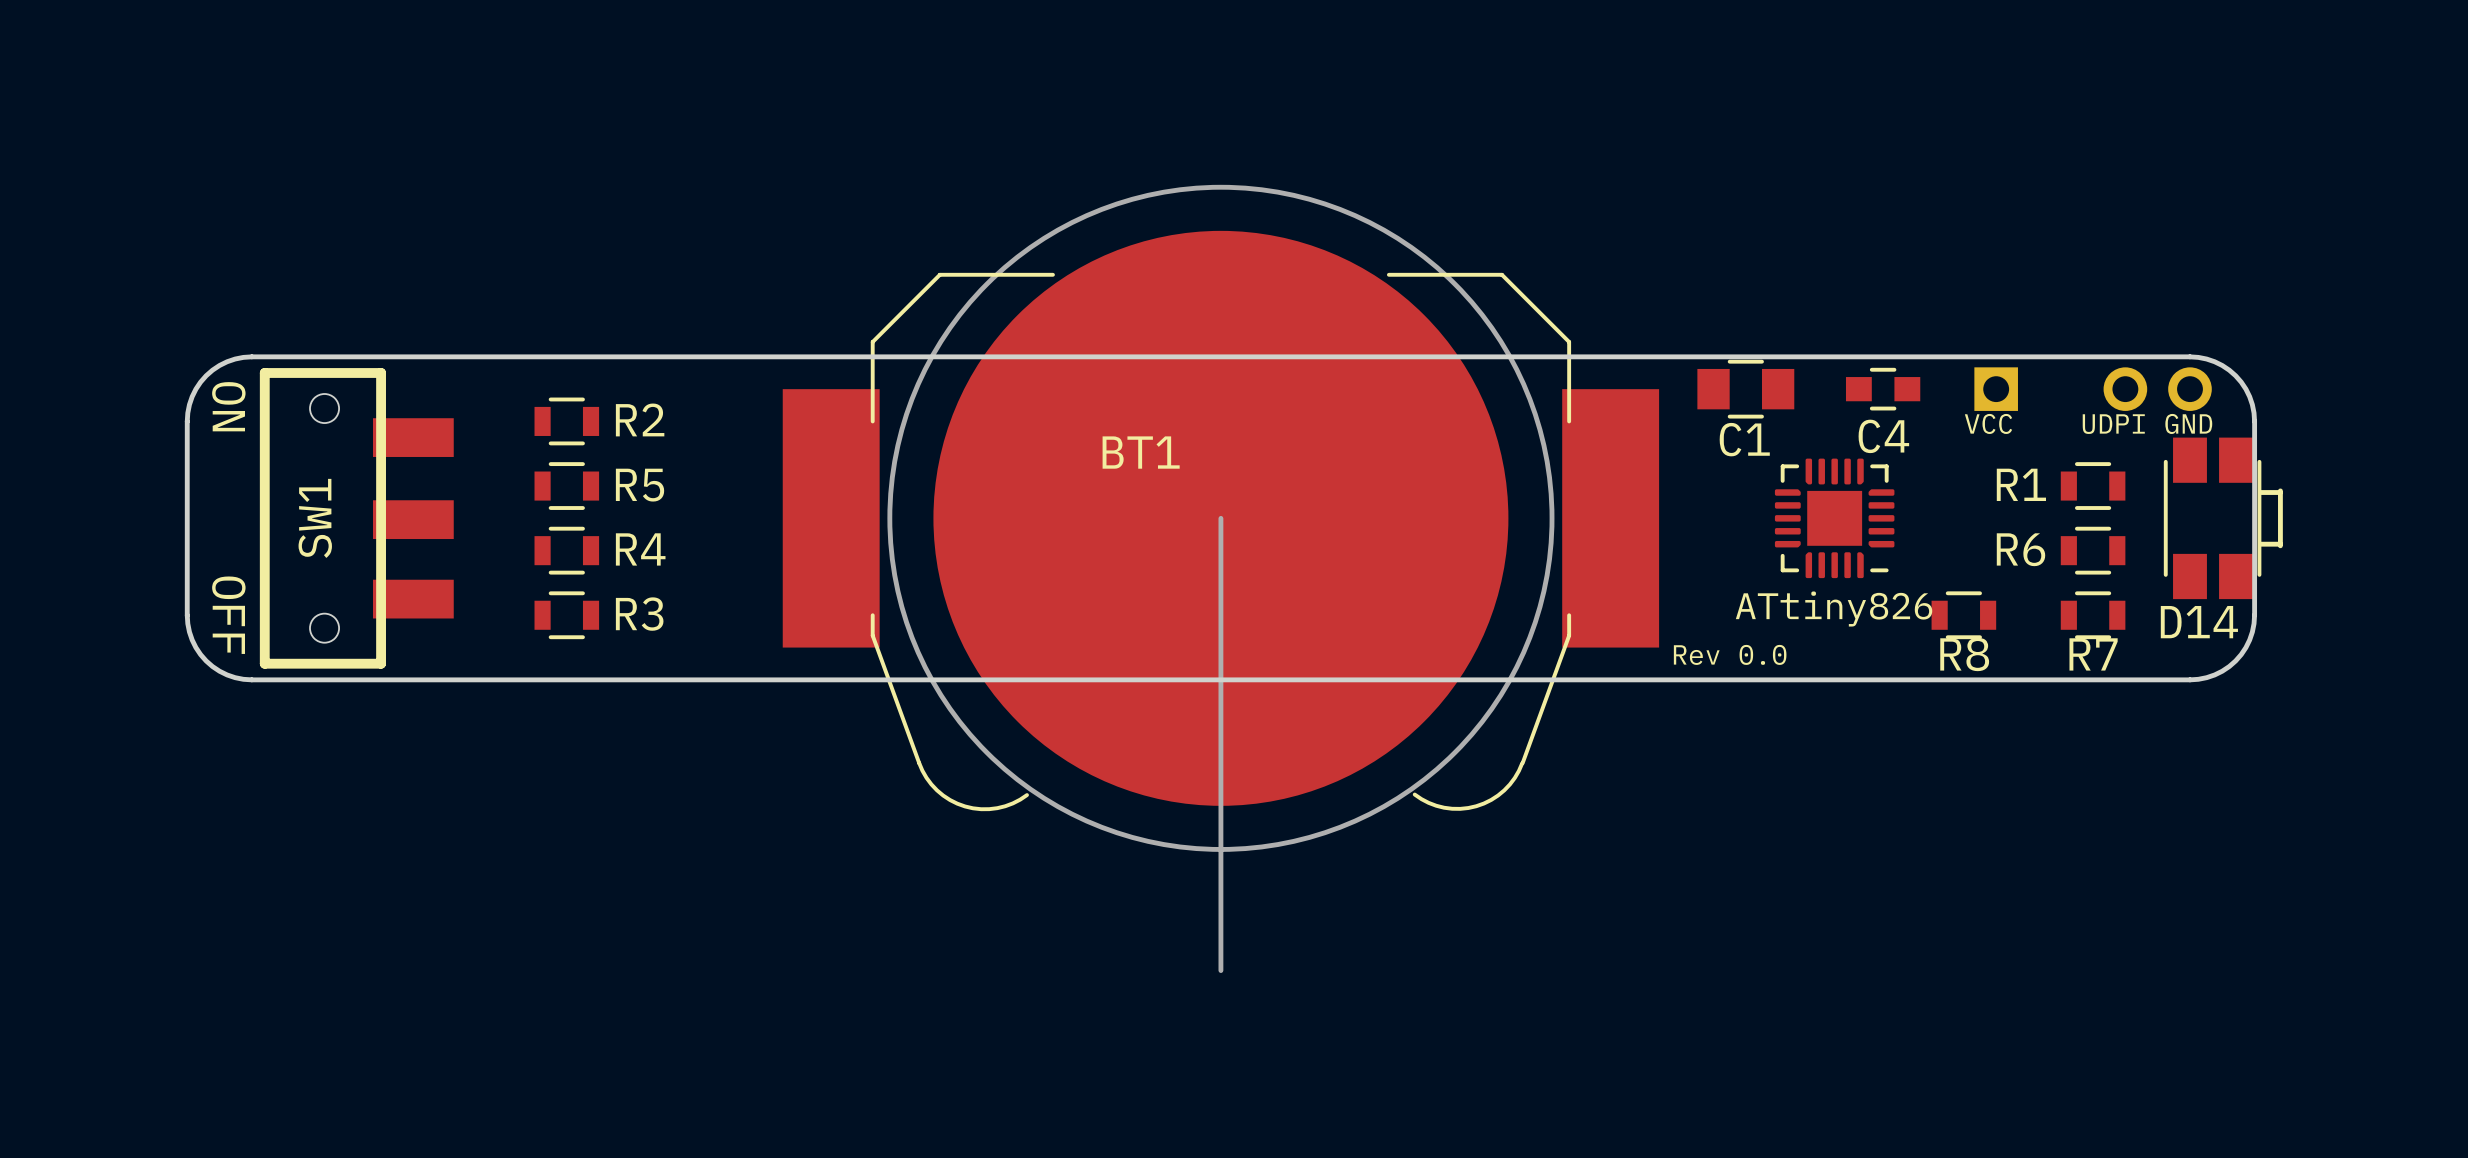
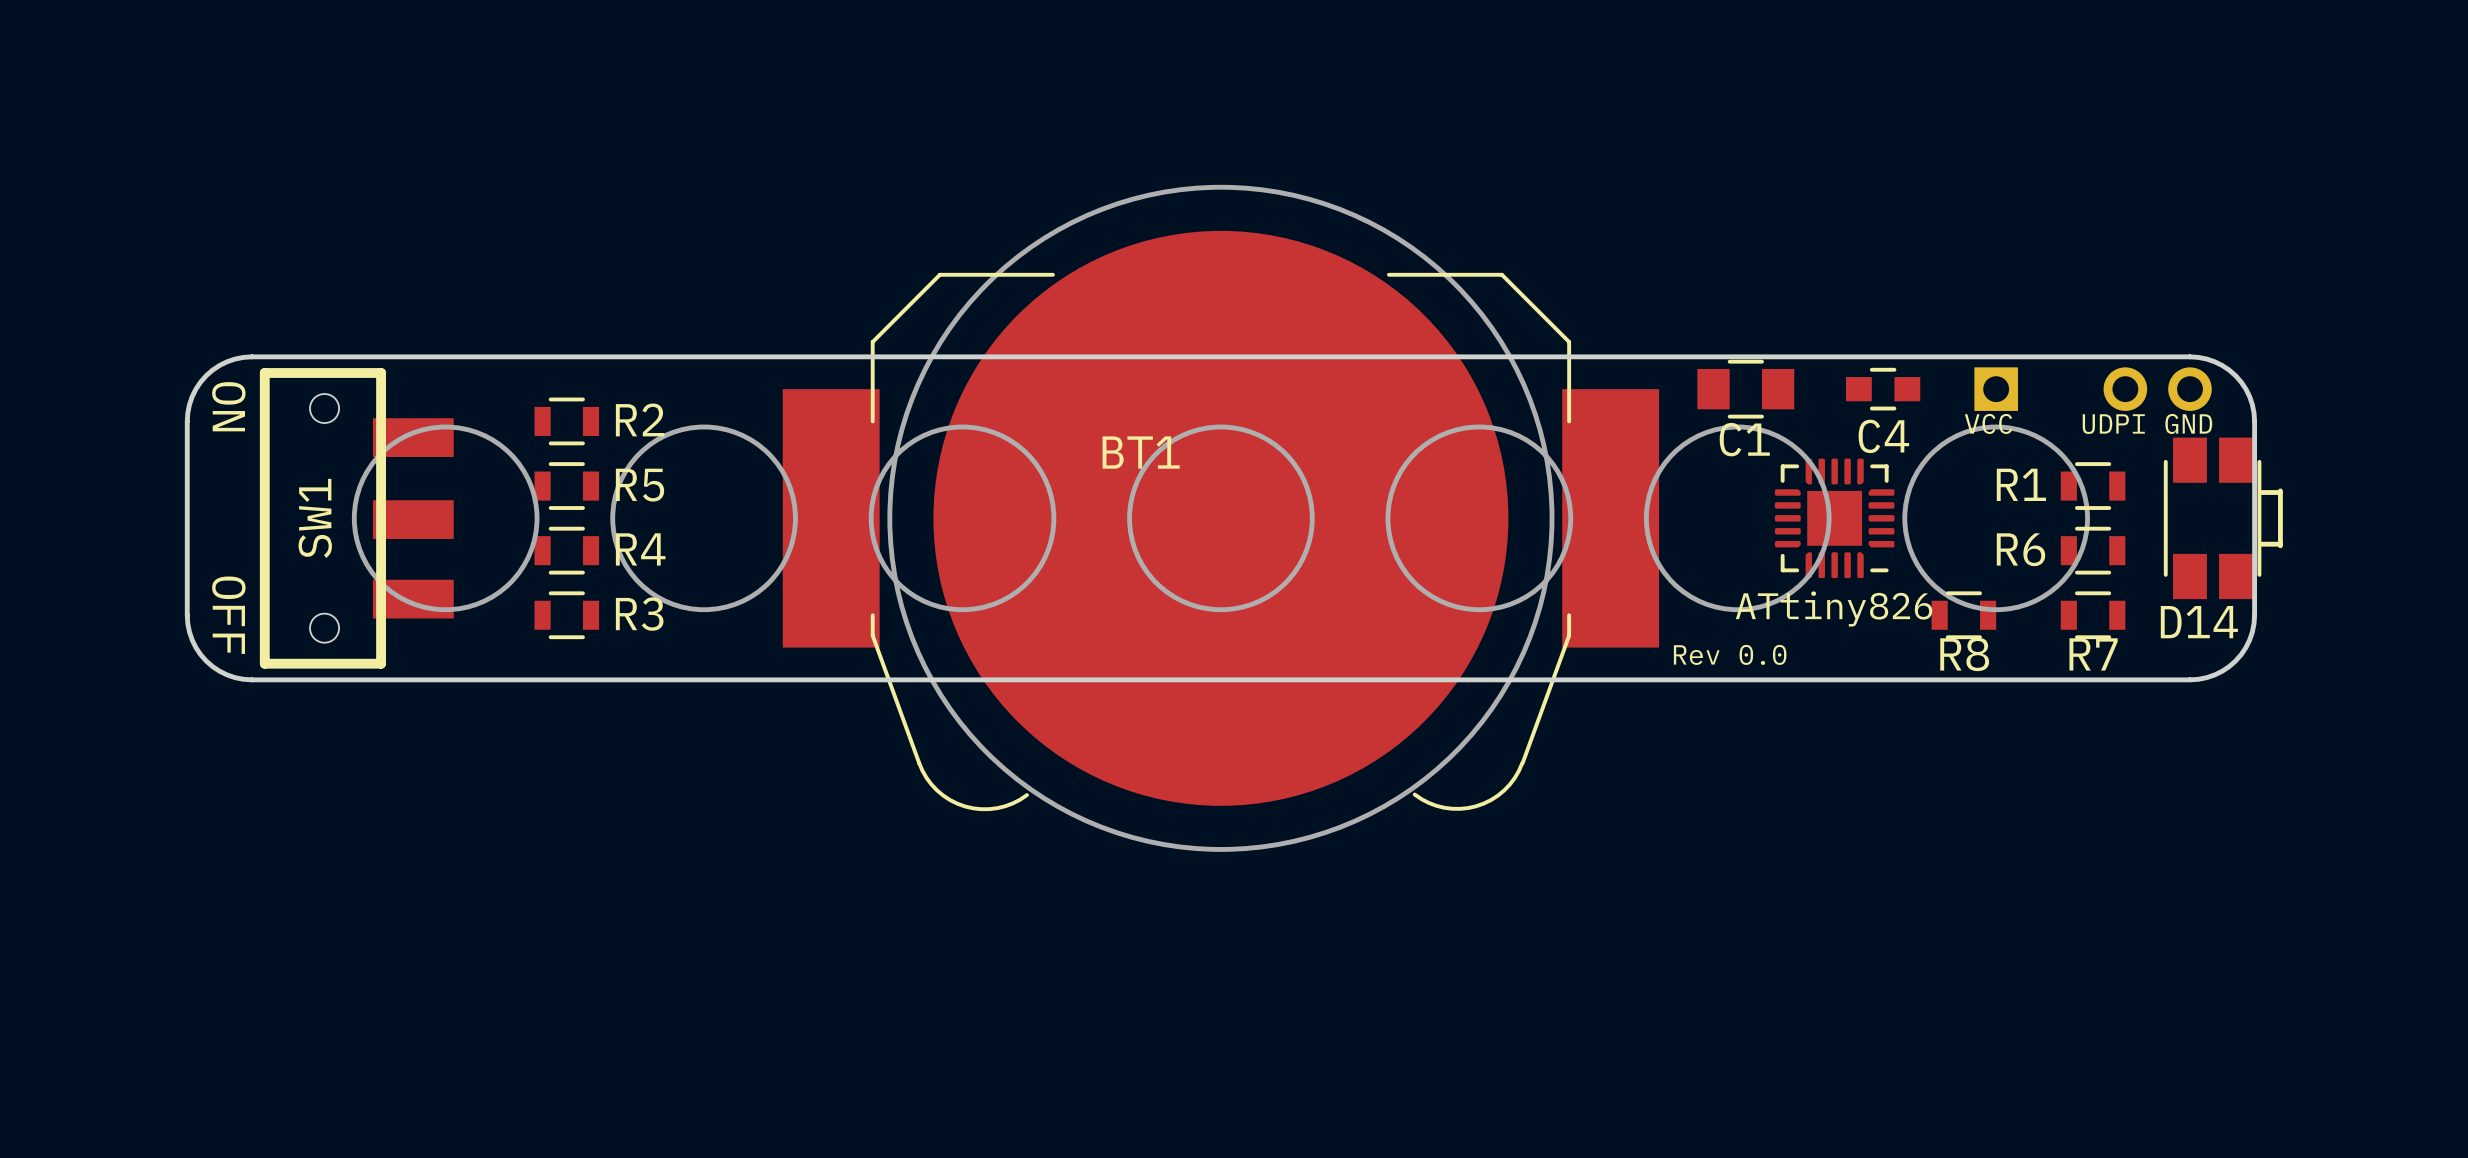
drawing: none -> [351, 424, 540, 613]
drawing: none -> [610, 424, 798, 613]
drawing: none -> [868, 424, 1057, 613]
drawing: none -> [1127, 424, 1315, 613]
drawing: none -> [1385, 424, 1574, 613]
drawing: none -> [1643, 424, 1832, 613]
drawing: none -> [1902, 424, 2090, 613]
line: (1220, 518) (1220, 970) -> none

